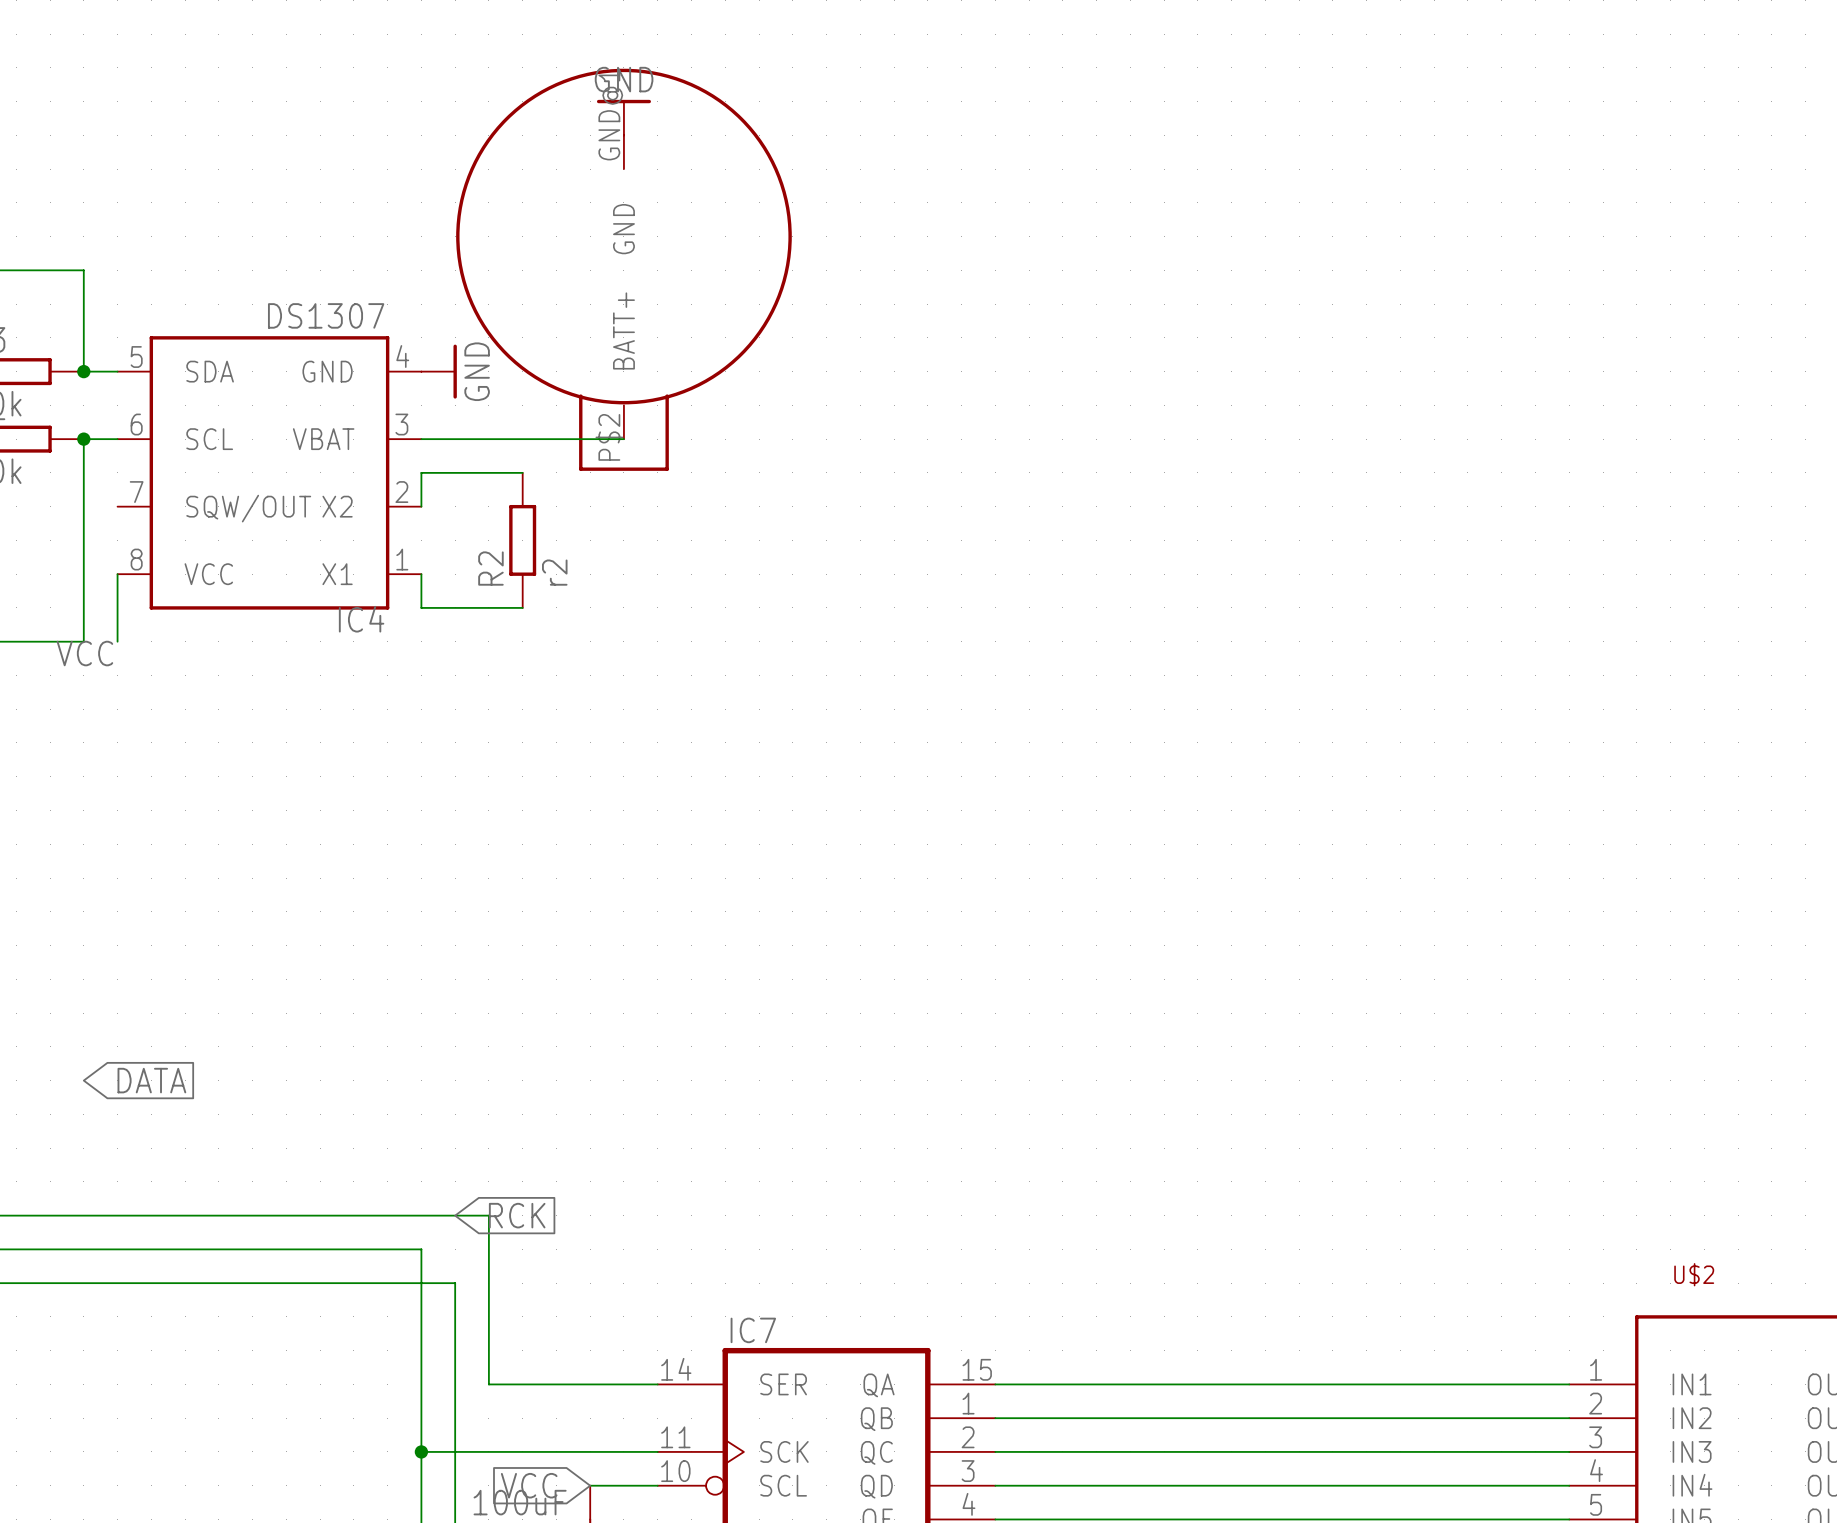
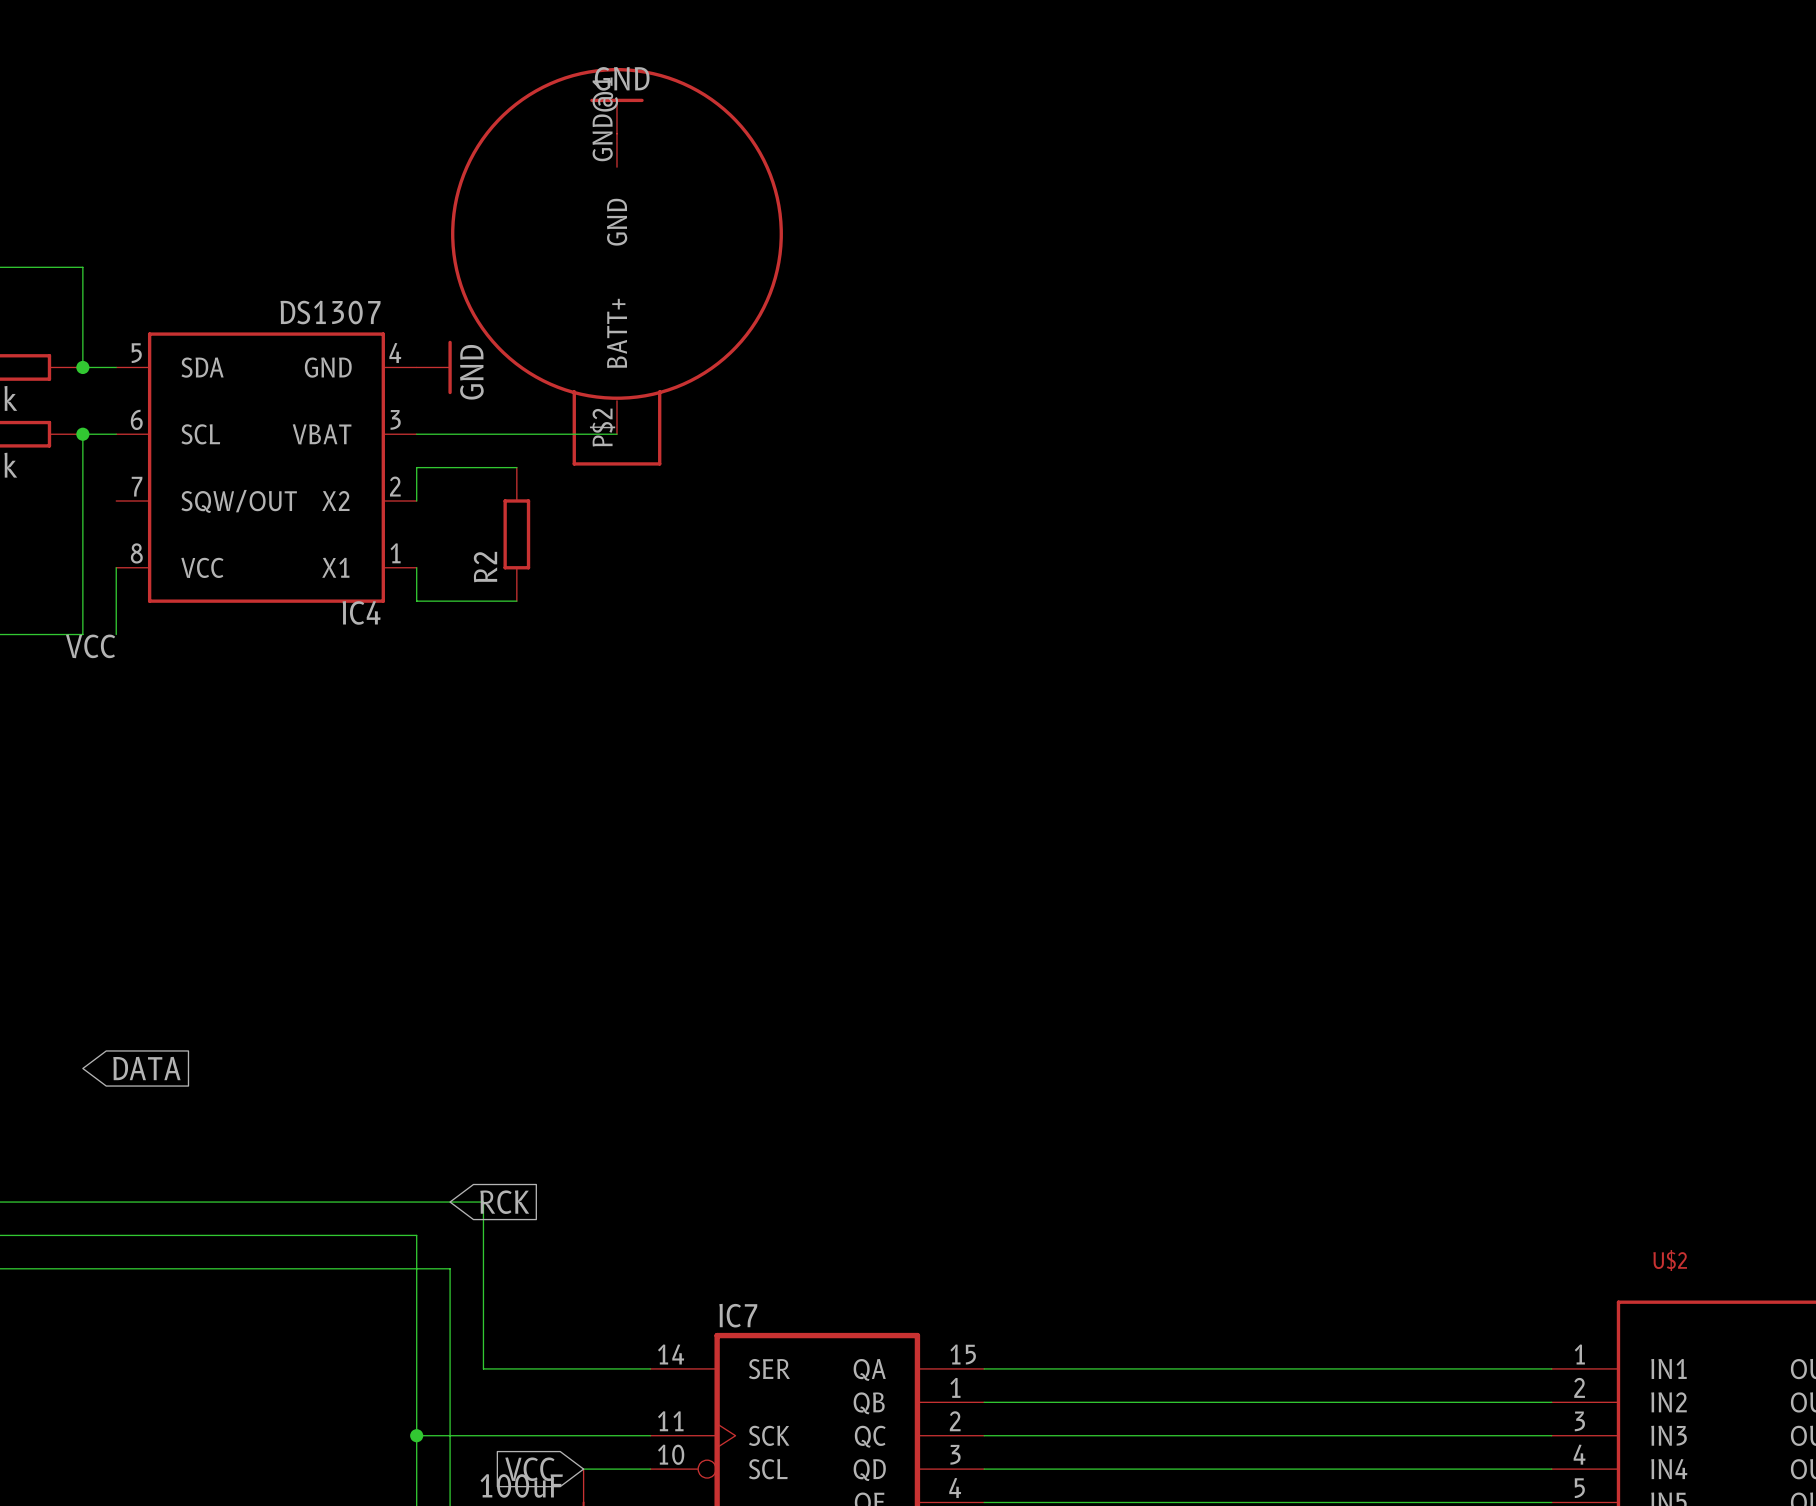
R2 value: r2 (554, 572) -> none

